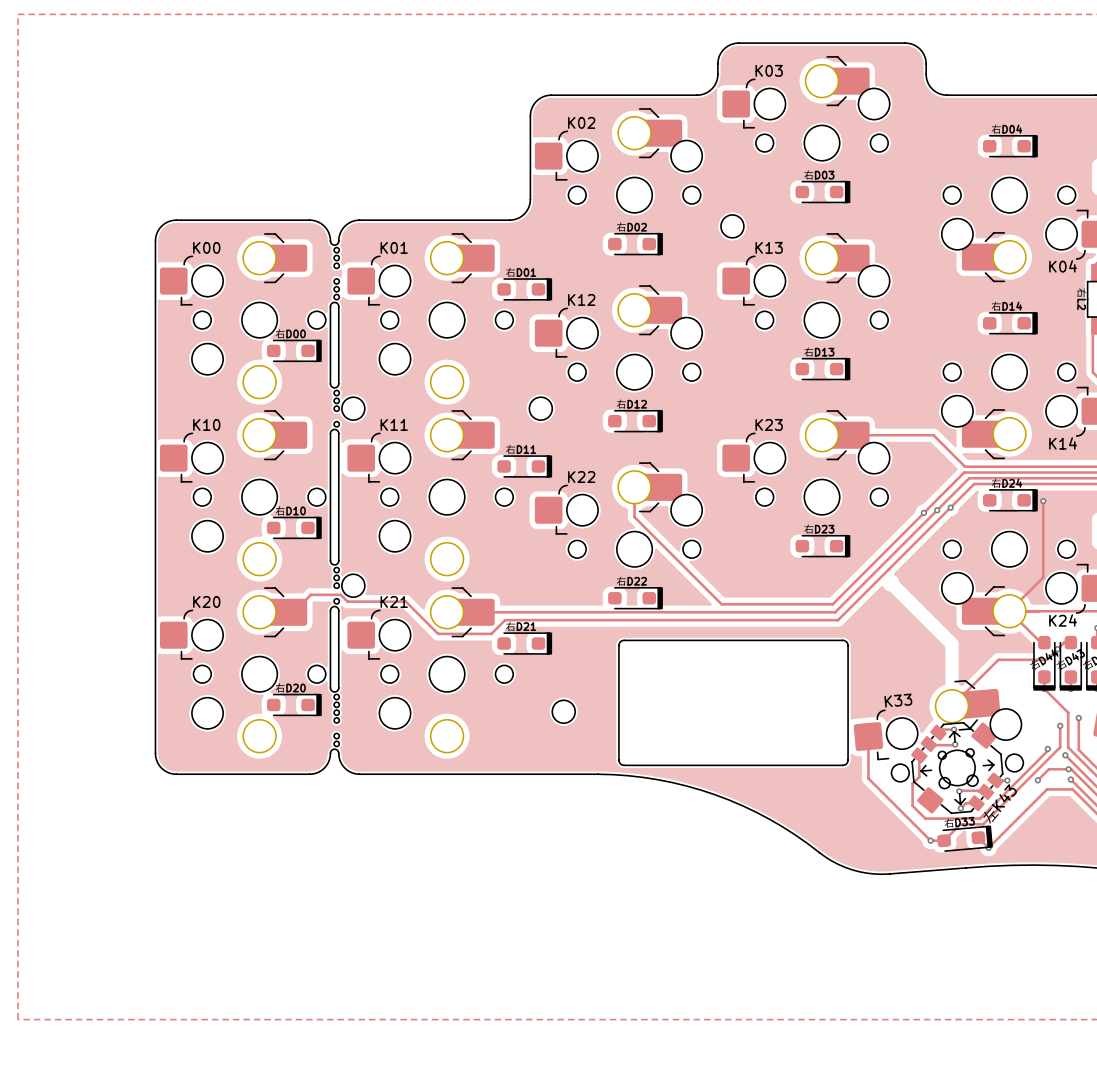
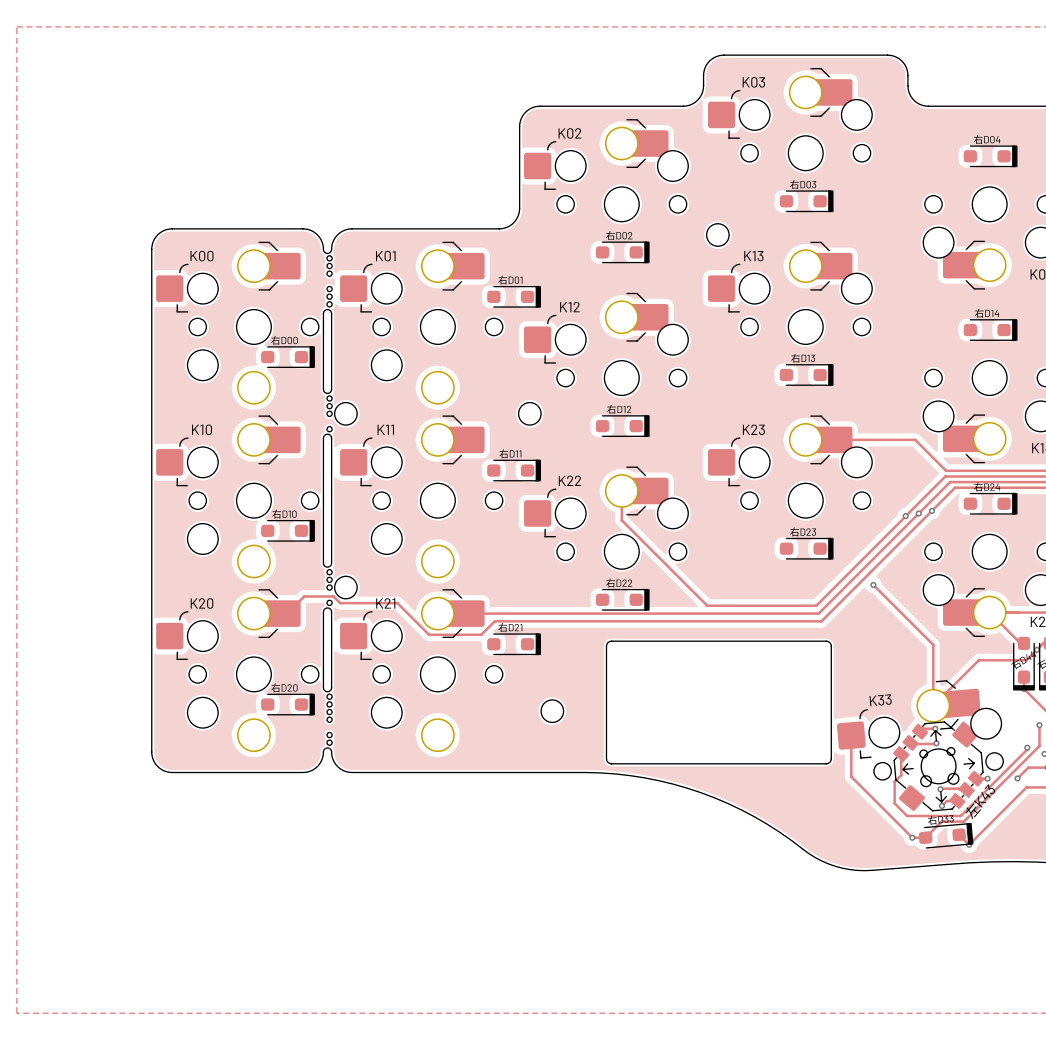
track: (1043, 501) (1043, 577) (1009, 611) -> none
via: (1043, 501) -> none
track: none -> (873, 584) (933, 644) (933, 705)
via: none -> (873, 584)

